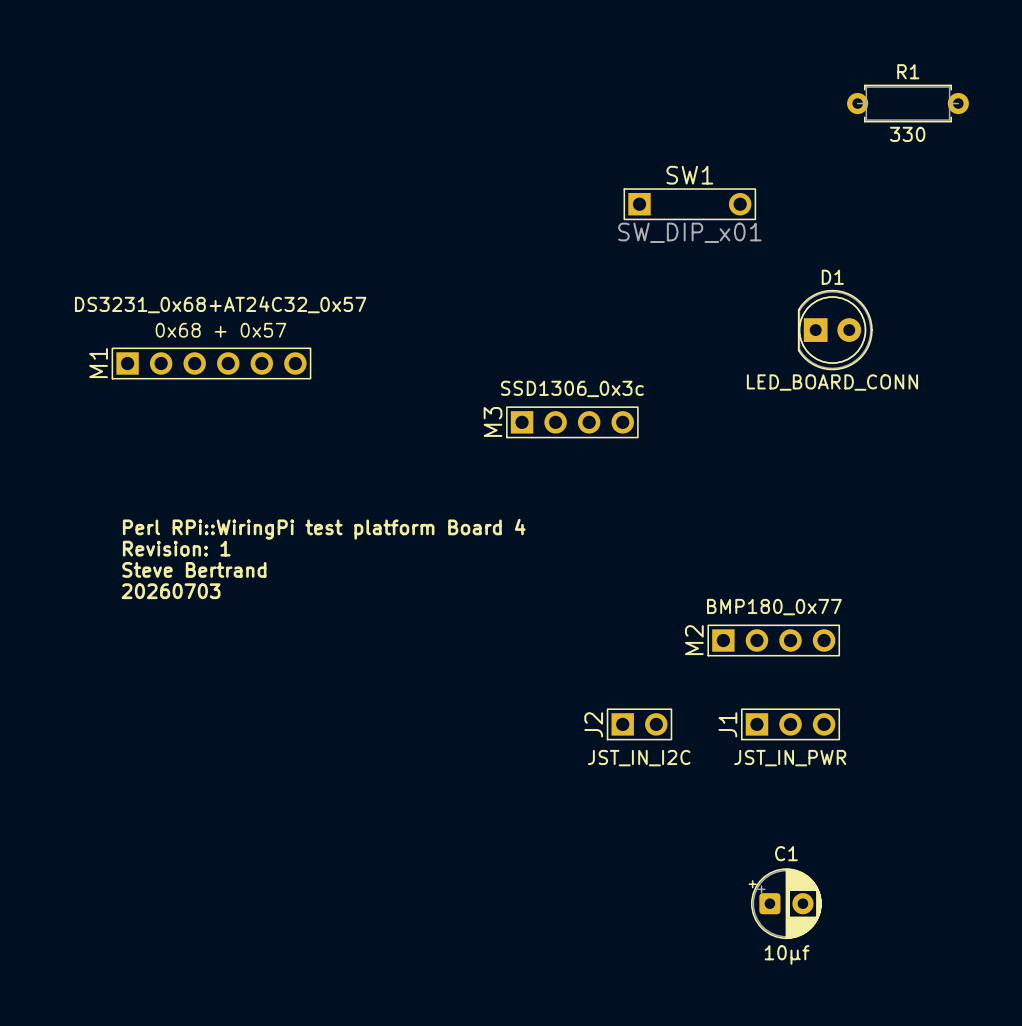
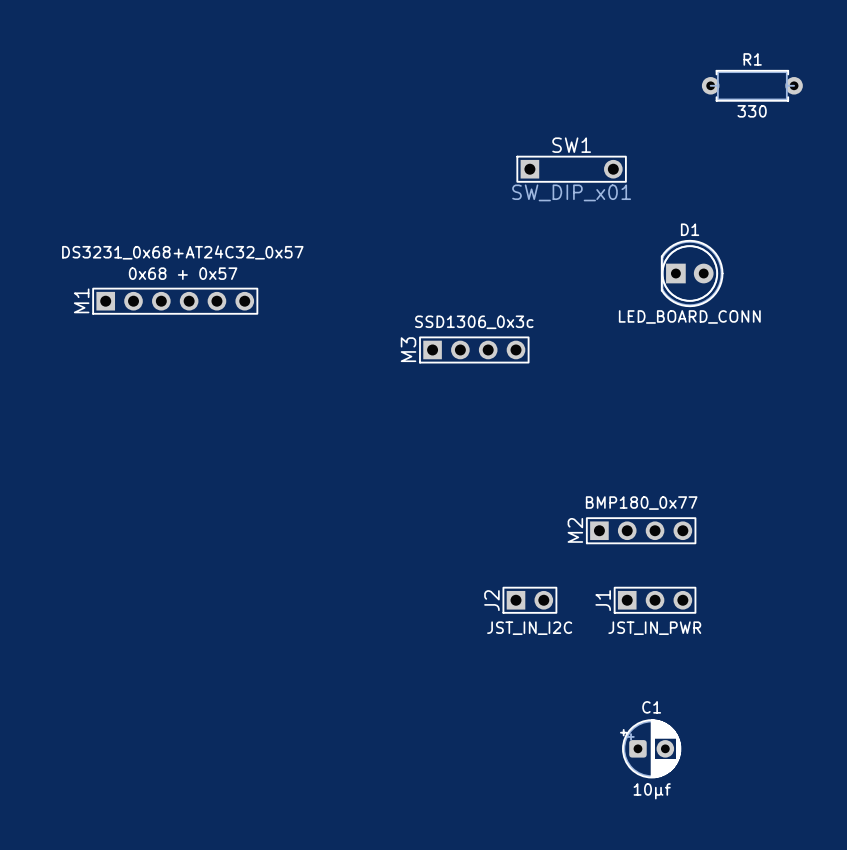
text: Perl RPi::WiringPi test platform Board 4 (324, 529) -> none
text: Revision: 1 (176, 548) -> none
text: Steve Bertrand (194, 569) -> none
text: 20260703 (171, 591) -> none

